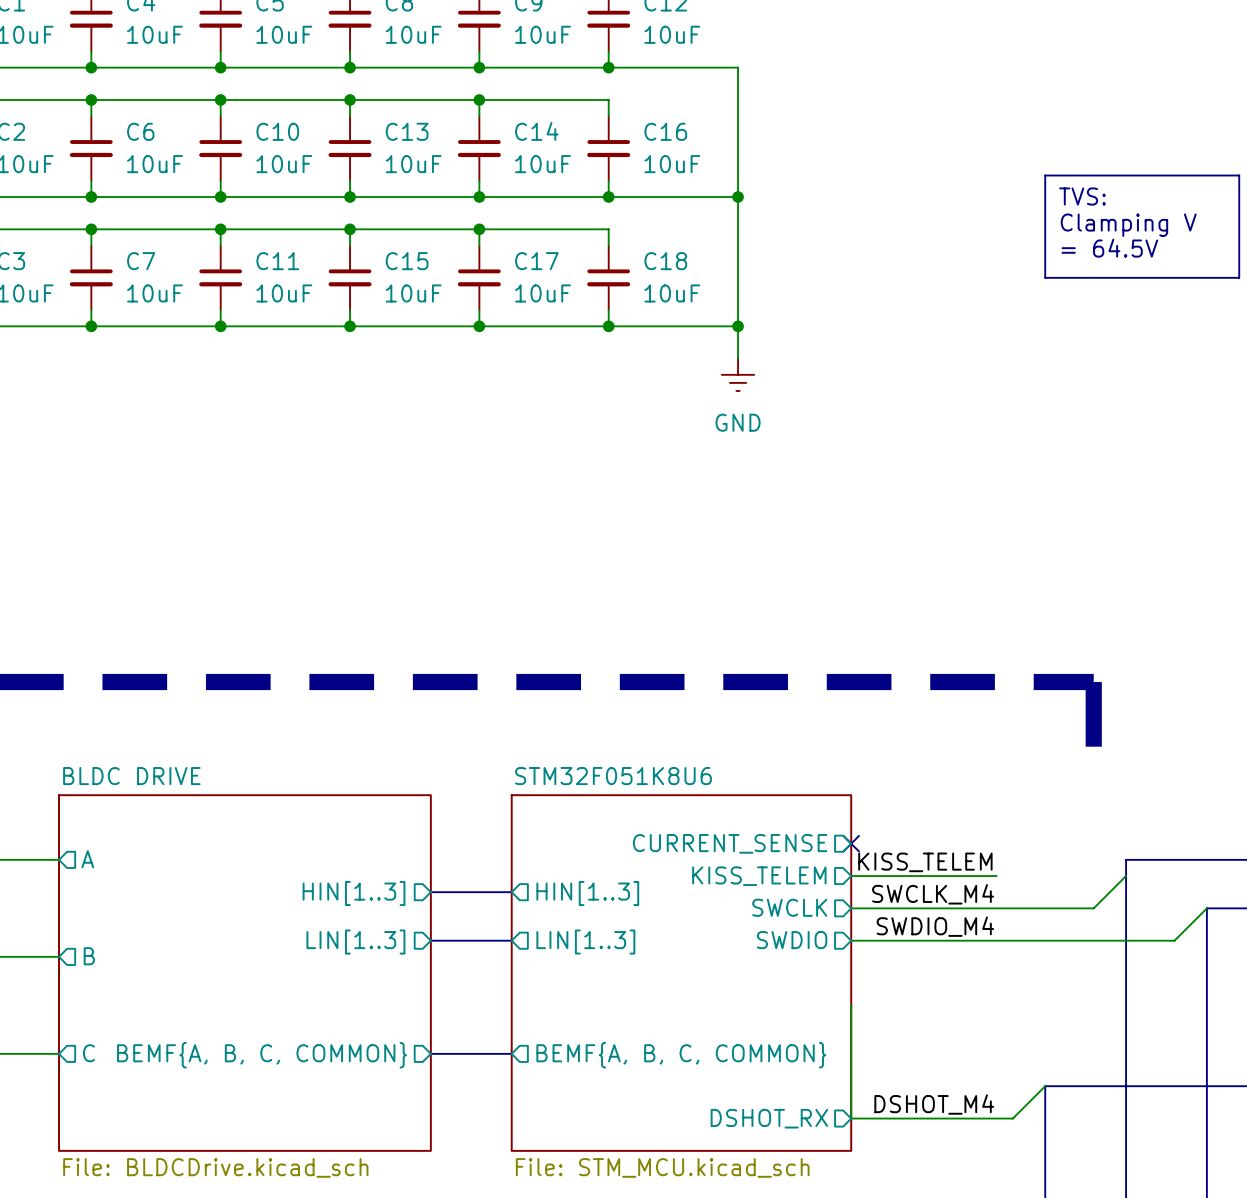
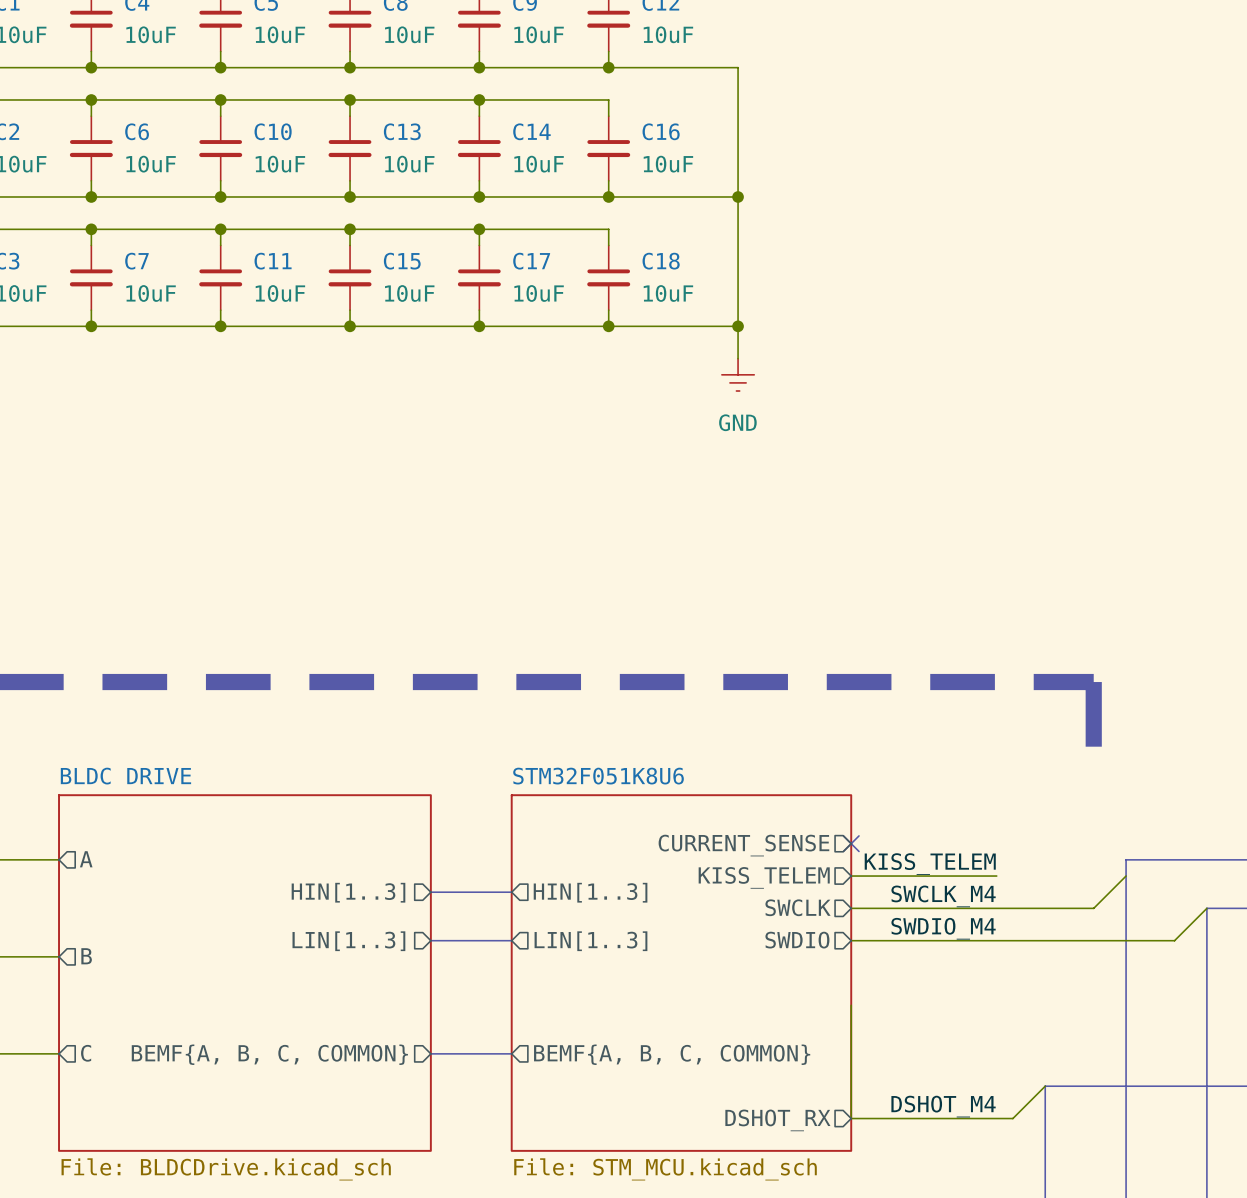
line: (1045, 175) (1239, 175) (1239, 277) (1045, 277) (1045, 175) -> none
text: TVS: (1082, 196) -> none
text: Clamping V (1128, 225) -> none
text: = 64.5V (1109, 248) -> none

